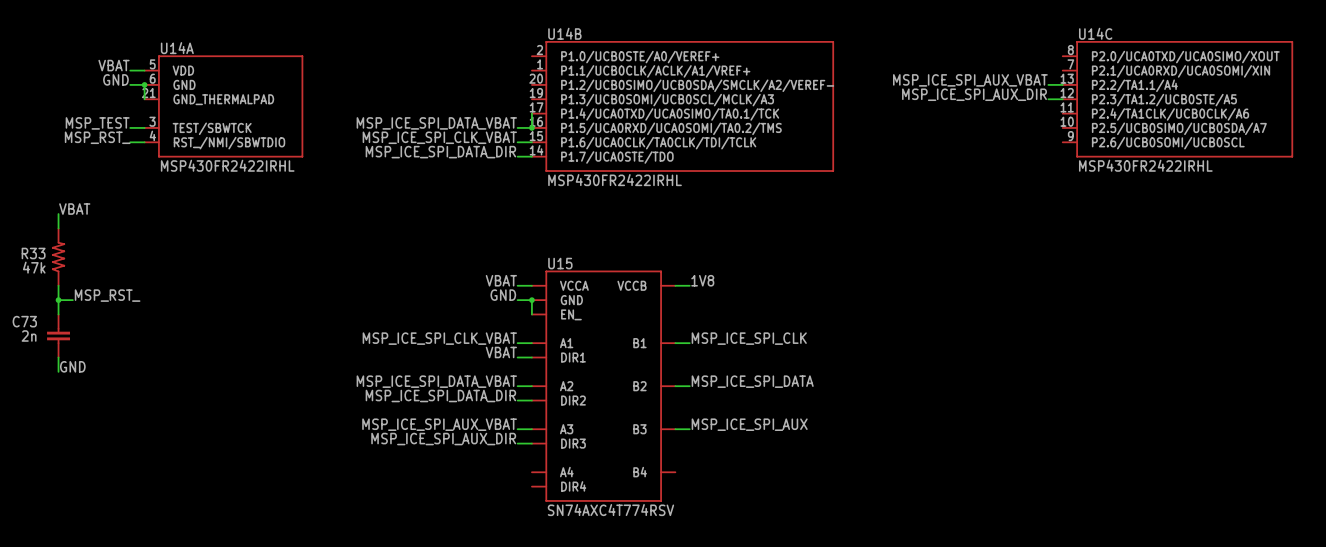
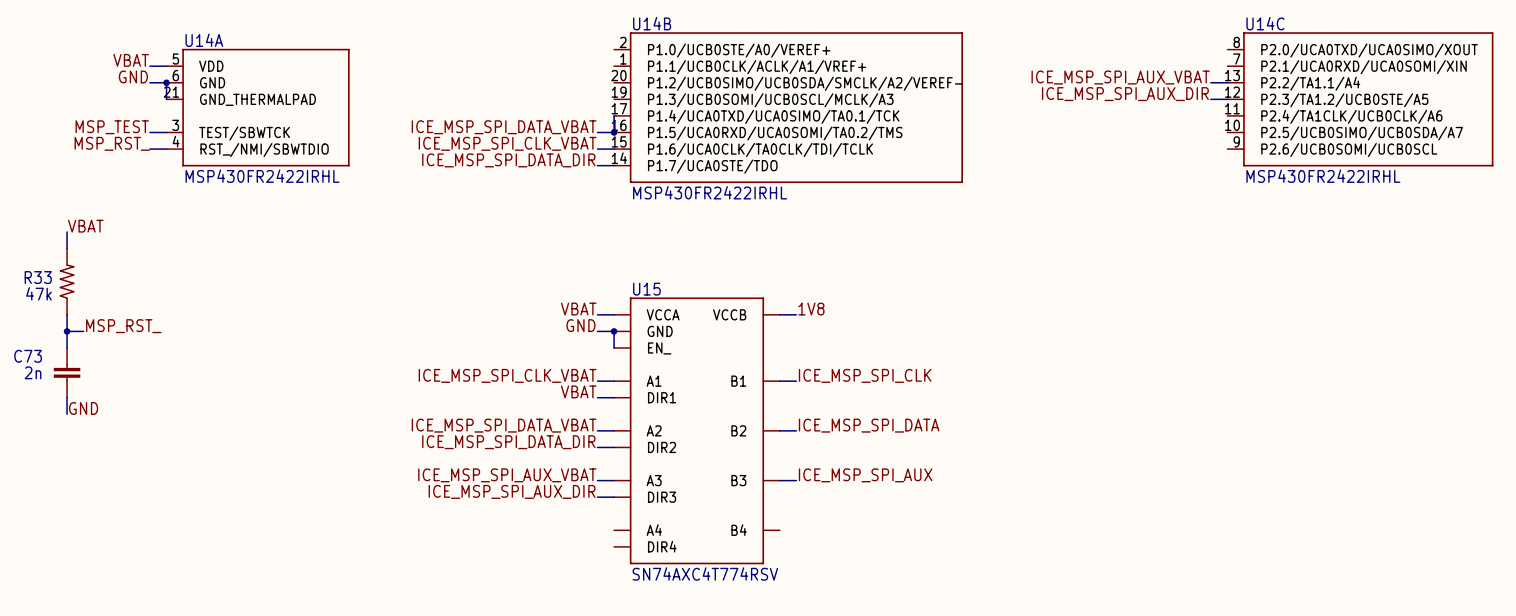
label: MSP_ICE_SPI_AUX_VBAT (970, 80) -> ICE_MSP_SPI_AUX_VBAT (1120, 77)
label: MSP_ICE_SPI_AUX_DIR (974, 94) -> ICE_MSP_SPI_AUX_DIR (1125, 94)
label: MSP_ICE_SPI_DATA_VBAT (436, 123) -> ICE_MSP_SPI_DATA_VBAT (504, 127)
label: MSP_ICE_SPI_CLK_VBAT (439, 137) -> ICE_MSP_SPI_CLK_VBAT (507, 143)
label: MSP_ICE_SPI_DATA_DIR (440, 152) -> ICE_MSP_SPI_DATA_DIR (508, 160)
label: MSP_ICE_SPI_CLK_VBAT (439, 338) -> ICE_MSP_SPI_CLK_VBAT (507, 375)
label: MSP_ICE_SPI_CLK (749, 338) -> ICE_MSP_SPI_CLK (865, 375)
label: MSP_ICE_SPI_DATA_VBAT (436, 381) -> ICE_MSP_SPI_DATA_VBAT (504, 425)
label: MSP_ICE_SPI_DATA (752, 381) -> ICE_MSP_SPI_DATA (869, 425)
label: MSP_ICE_SPI_DATA_DIR (440, 396) -> ICE_MSP_SPI_DATA_DIR (508, 442)
label: MSP_ICE_SPI_AUX_VBAT (439, 424) -> ICE_MSP_SPI_AUX_VBAT (507, 475)
label: MSP_ICE_SPI_AUX (749, 424) -> ICE_MSP_SPI_AUX (865, 475)
label: MSP_ICE_SPI_AUX_DIR (443, 439) -> ICE_MSP_SPI_AUX_DIR (512, 491)

